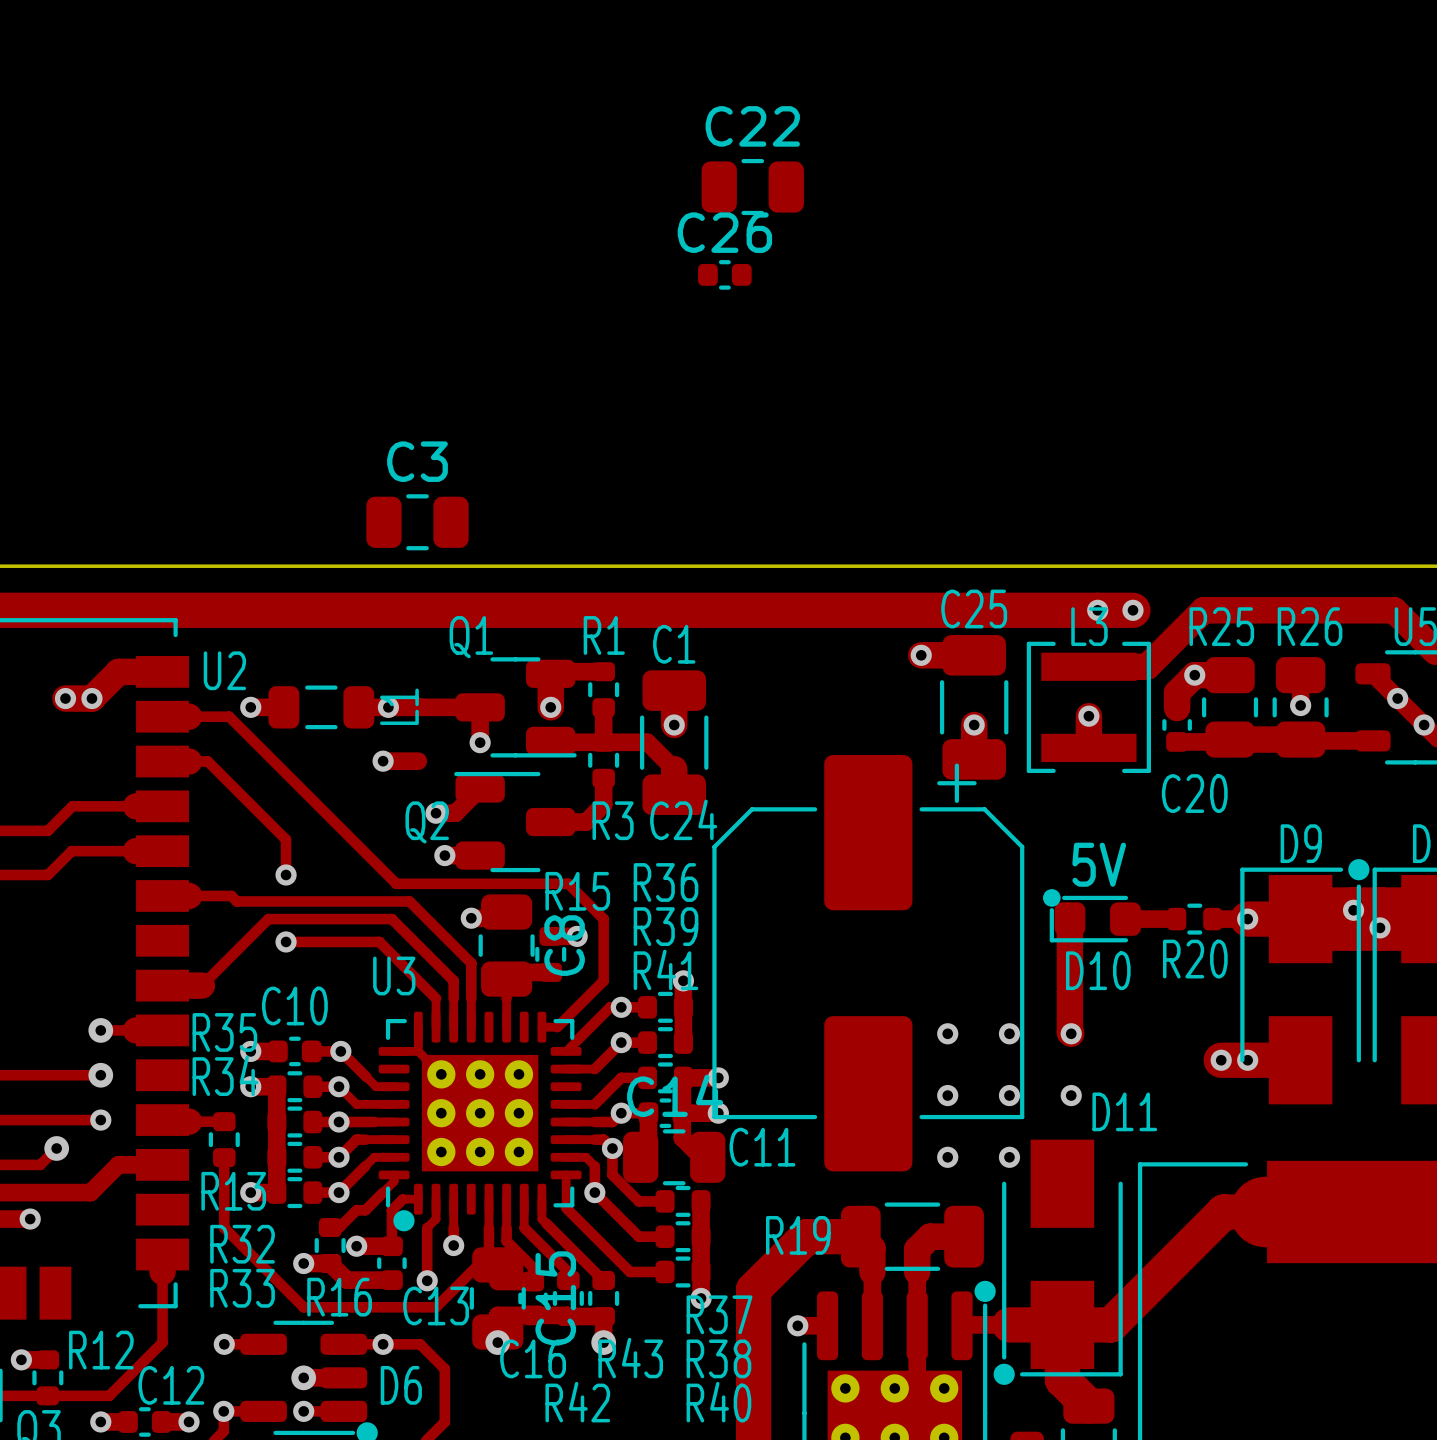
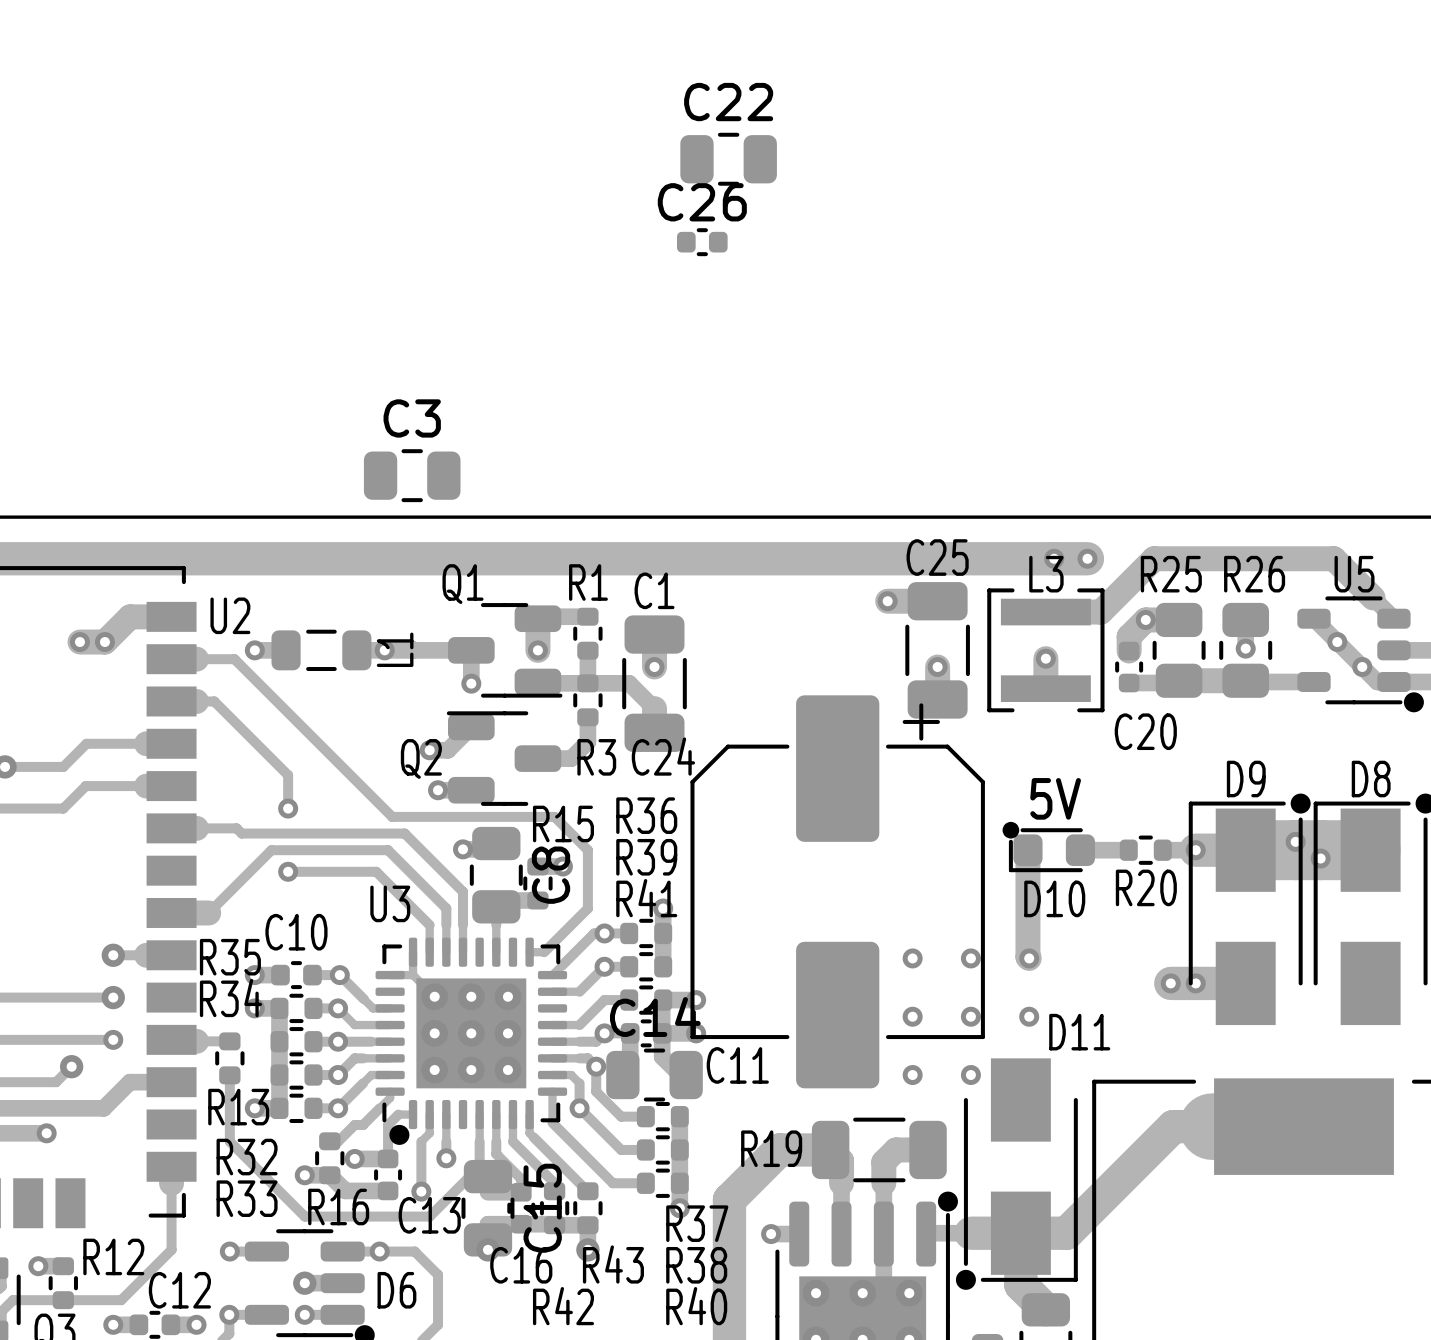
track: (383, 761) (418, 761) -> none
via: (383, 761) -> none

